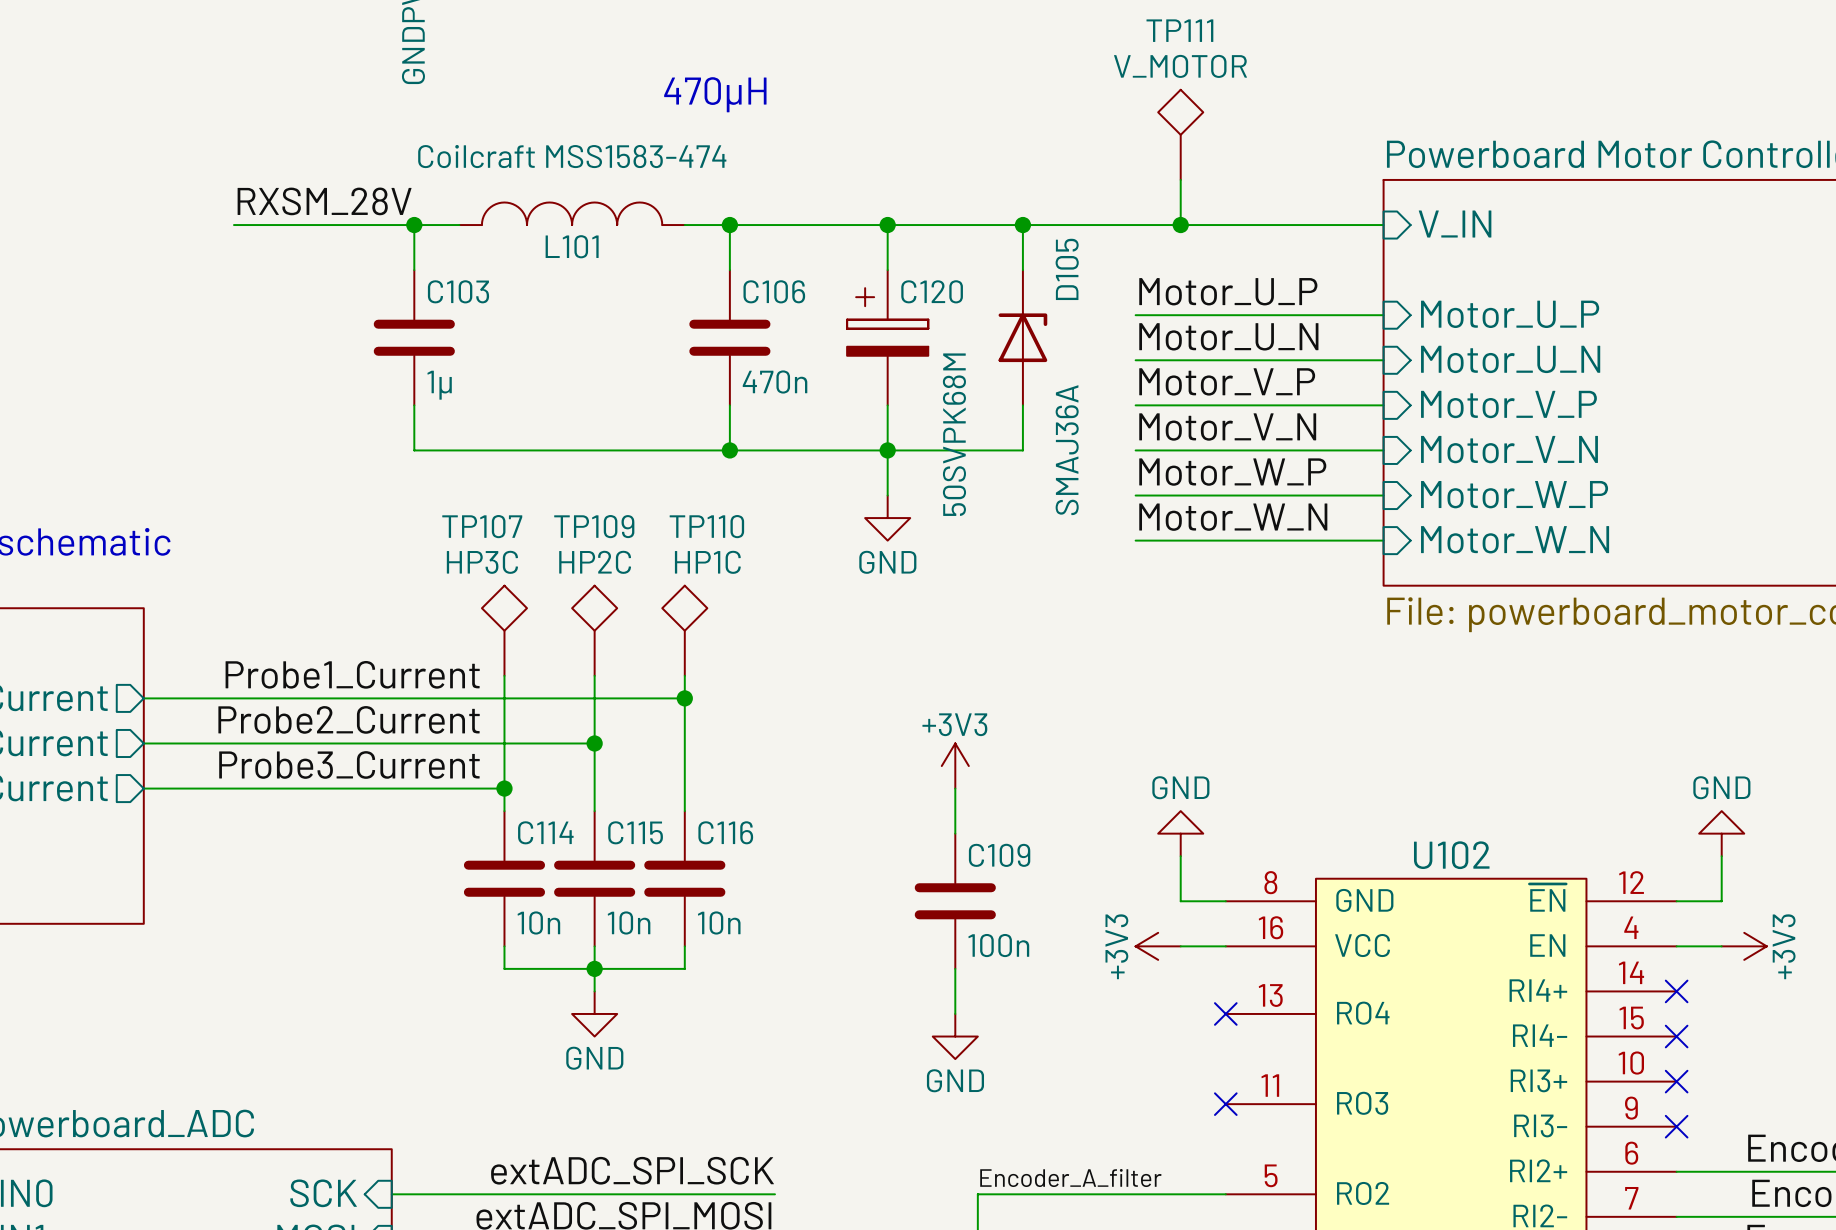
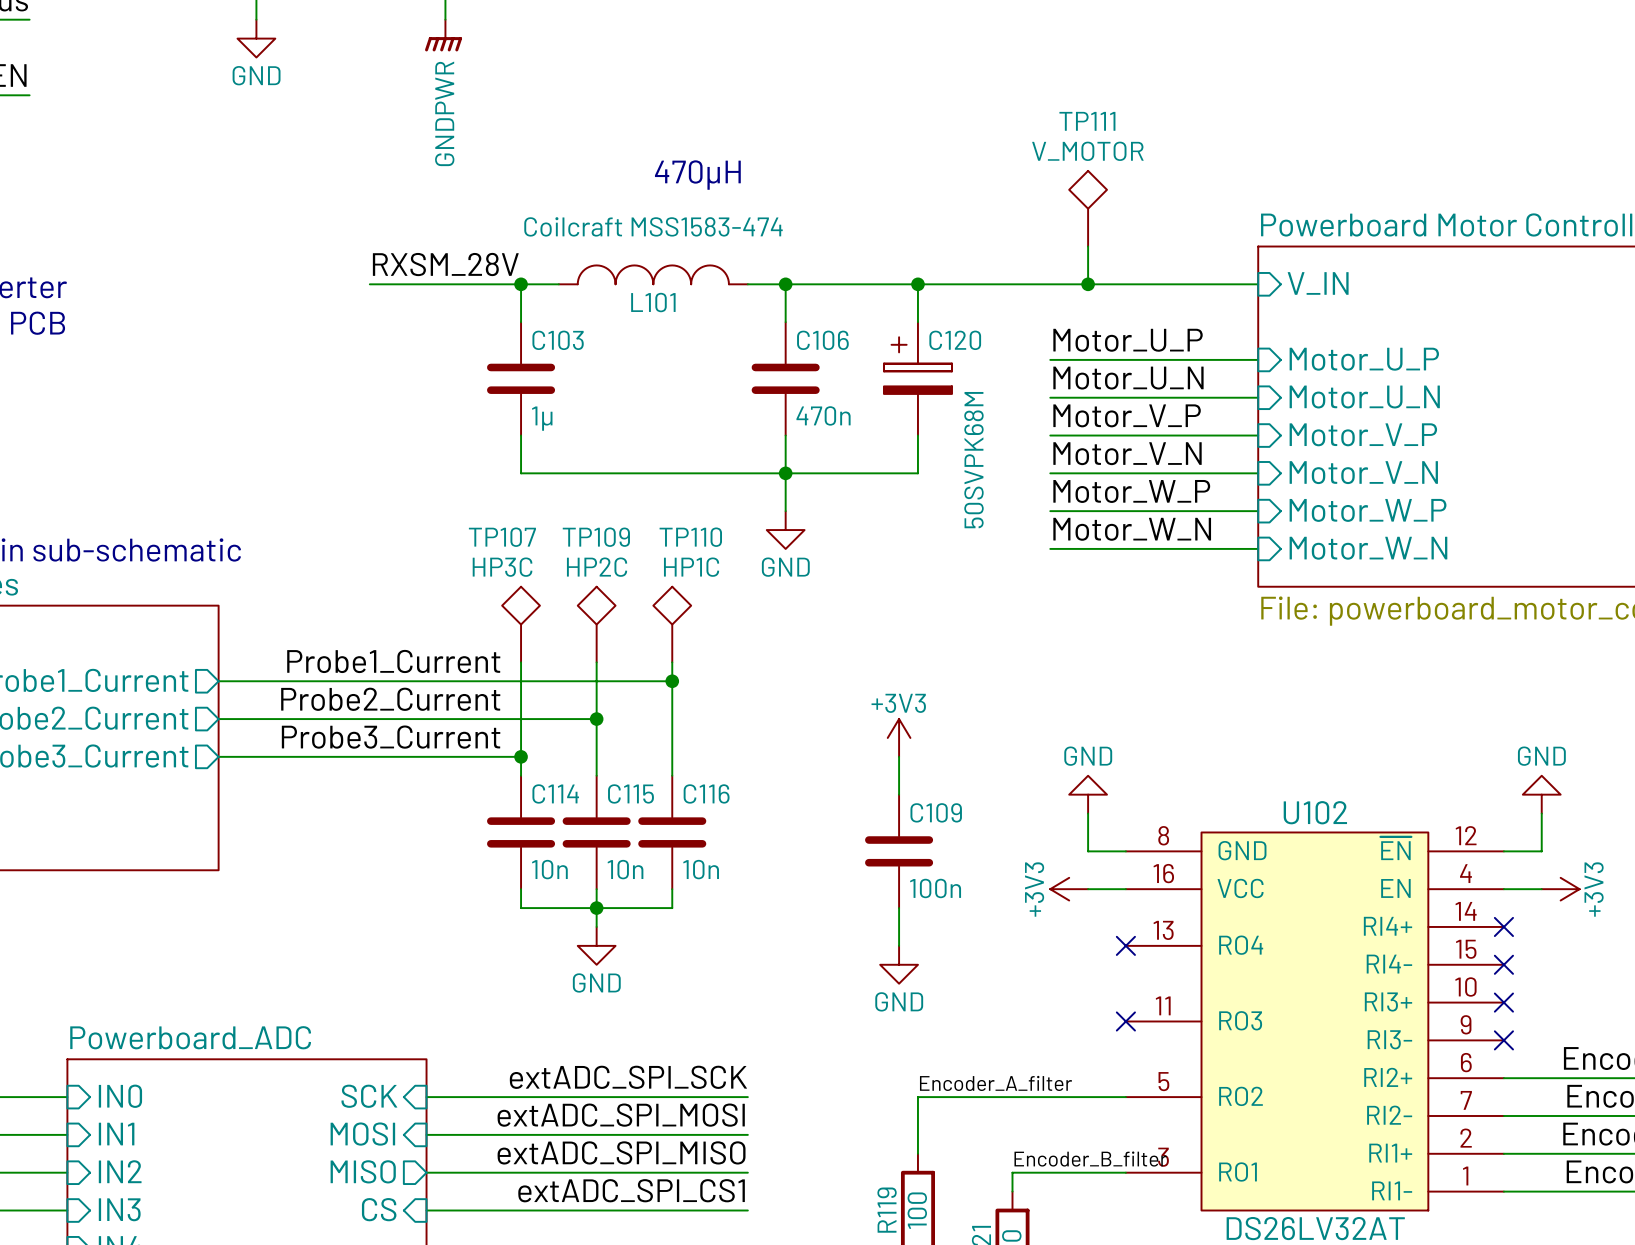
label position: RXSM_28V (324, 201) -> RXSM_28V (445, 264)
L101 position: (572, 213) -> (653, 274)
wire: (233, 225) (324, 225) -> none
wire: (414, 225) (414, 270) -> (521, 284) (521, 322)
junction position: (414, 225) -> (521, 284)
wire: (684, 225) (774, 225) -> (483, 284) (558, 284)
wire: (729, 225) (729, 270) -> (785, 284) (785, 322)
junction: (729, 225) -> none
junction: none -> (785, 284)
wire: (887, 225) (887, 270) -> (917, 284) (917, 322)
junction: (887, 225) -> none
junction: none -> (917, 284)
wire: (1022, 225) (1022, 270) -> none
junction: (1022, 225) -> none
C103 position: (414, 337) -> (521, 378)
C106 position: (729, 337) -> (785, 378)
C120 position: (887, 337) -> (917, 378)
D105: SMAJ36A (1022, 337) -> none
wire: (414, 405) (414, 450) (504, 450) -> (521, 435) (521, 473)
wire: (729, 405) (729, 450) -> none
wire: (887, 405) (887, 495) -> (785, 435) (785, 511)
wire: (1022, 405) (1022, 450) (977, 450) -> (917, 435) (917, 473)
junction: (729, 450) -> none
junction: none -> (785, 473)
junction: (887, 450) -> none
power symbol position: GND (887, 518) -> GND (785, 530)

